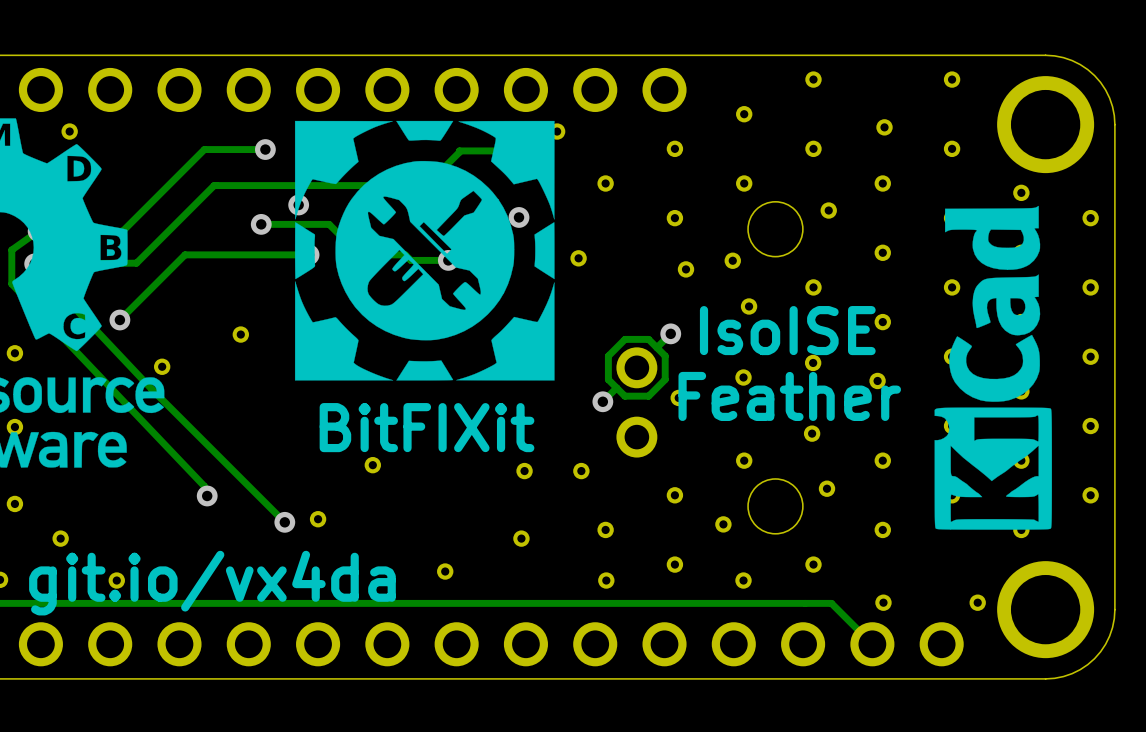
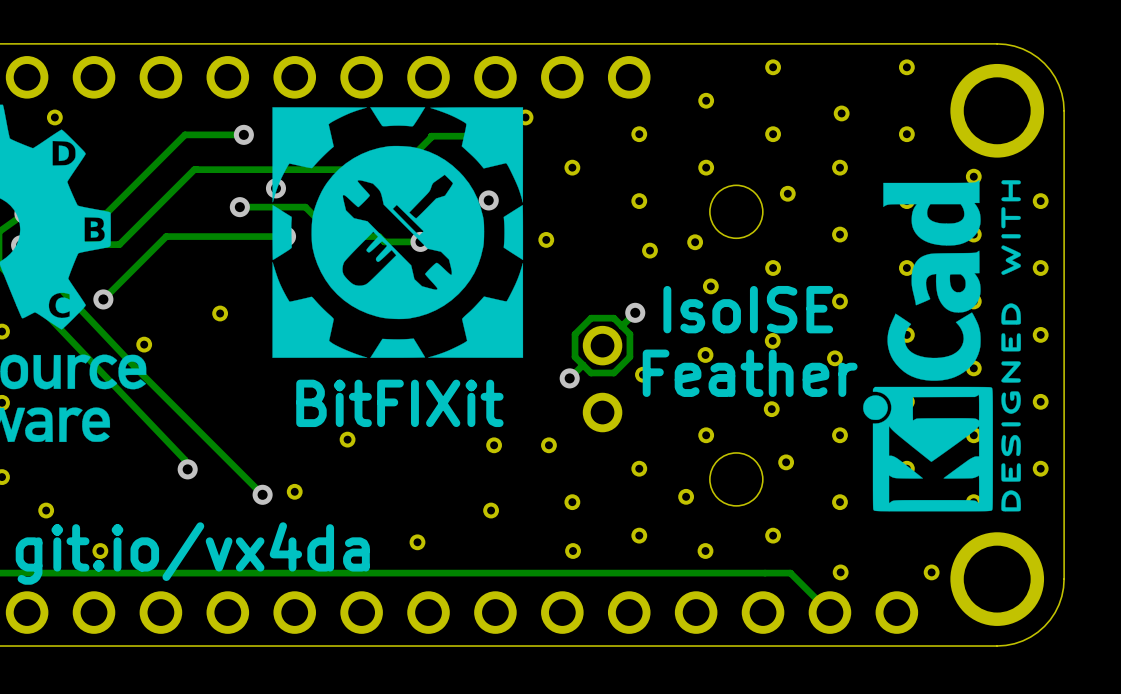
drawing shape: [934, 205, 1052, 530] -> [863, 180, 1021, 512]

